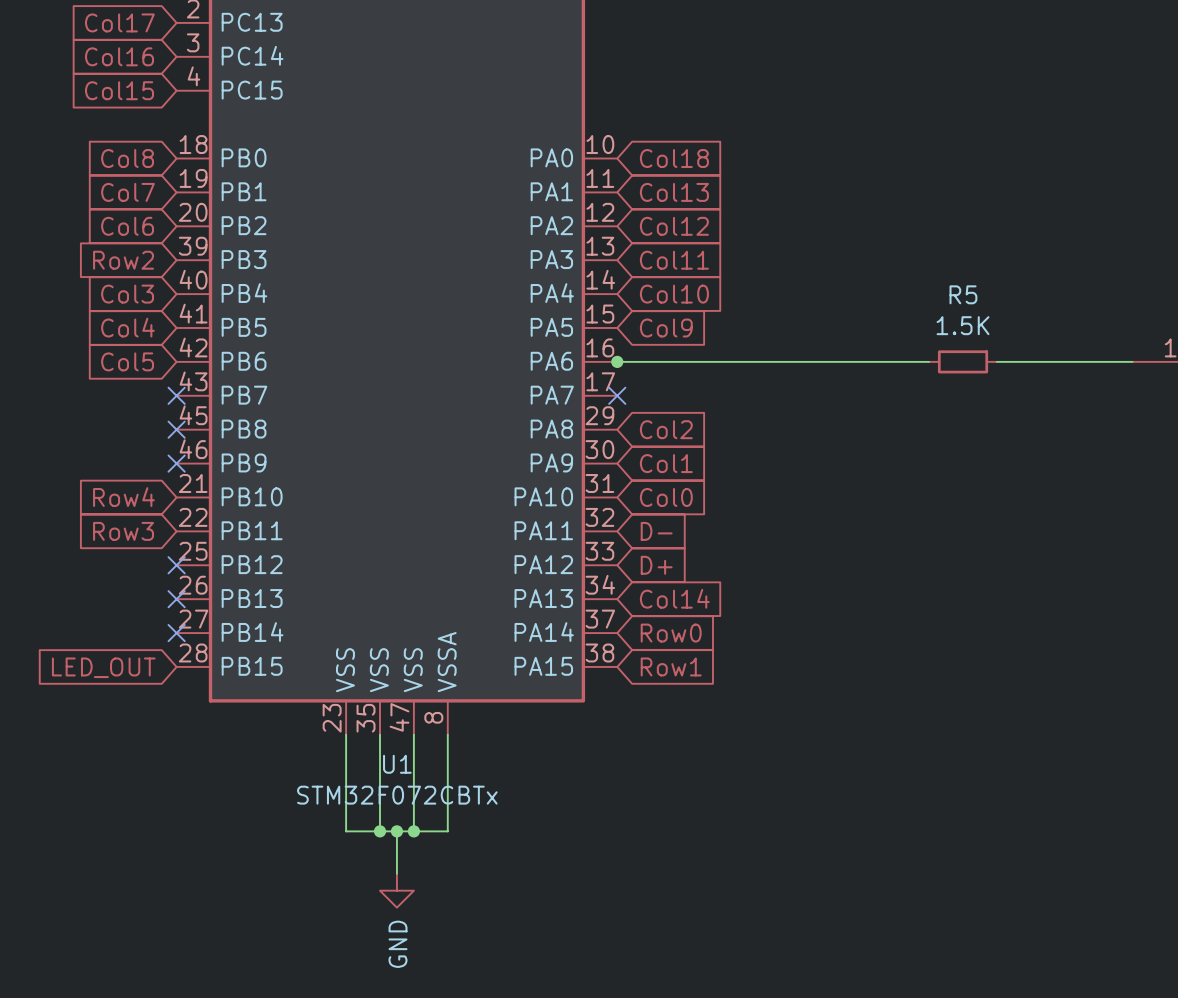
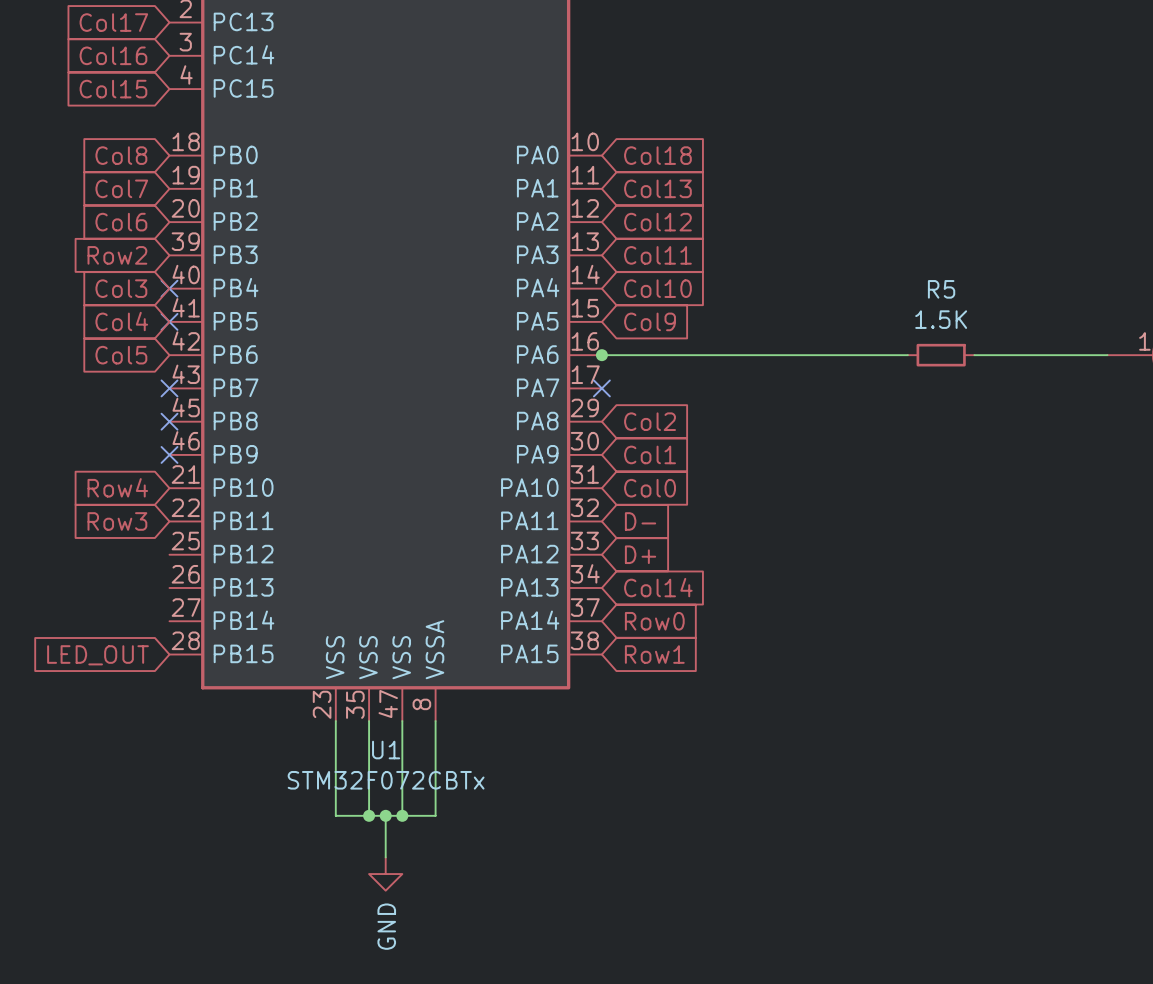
no-connect mark: none -> (169, 288)
no-connect mark: none -> (169, 321)
no-connect mark: (176, 565) -> none
no-connect mark: (176, 599) -> none
no-connect mark: (176, 633) -> none

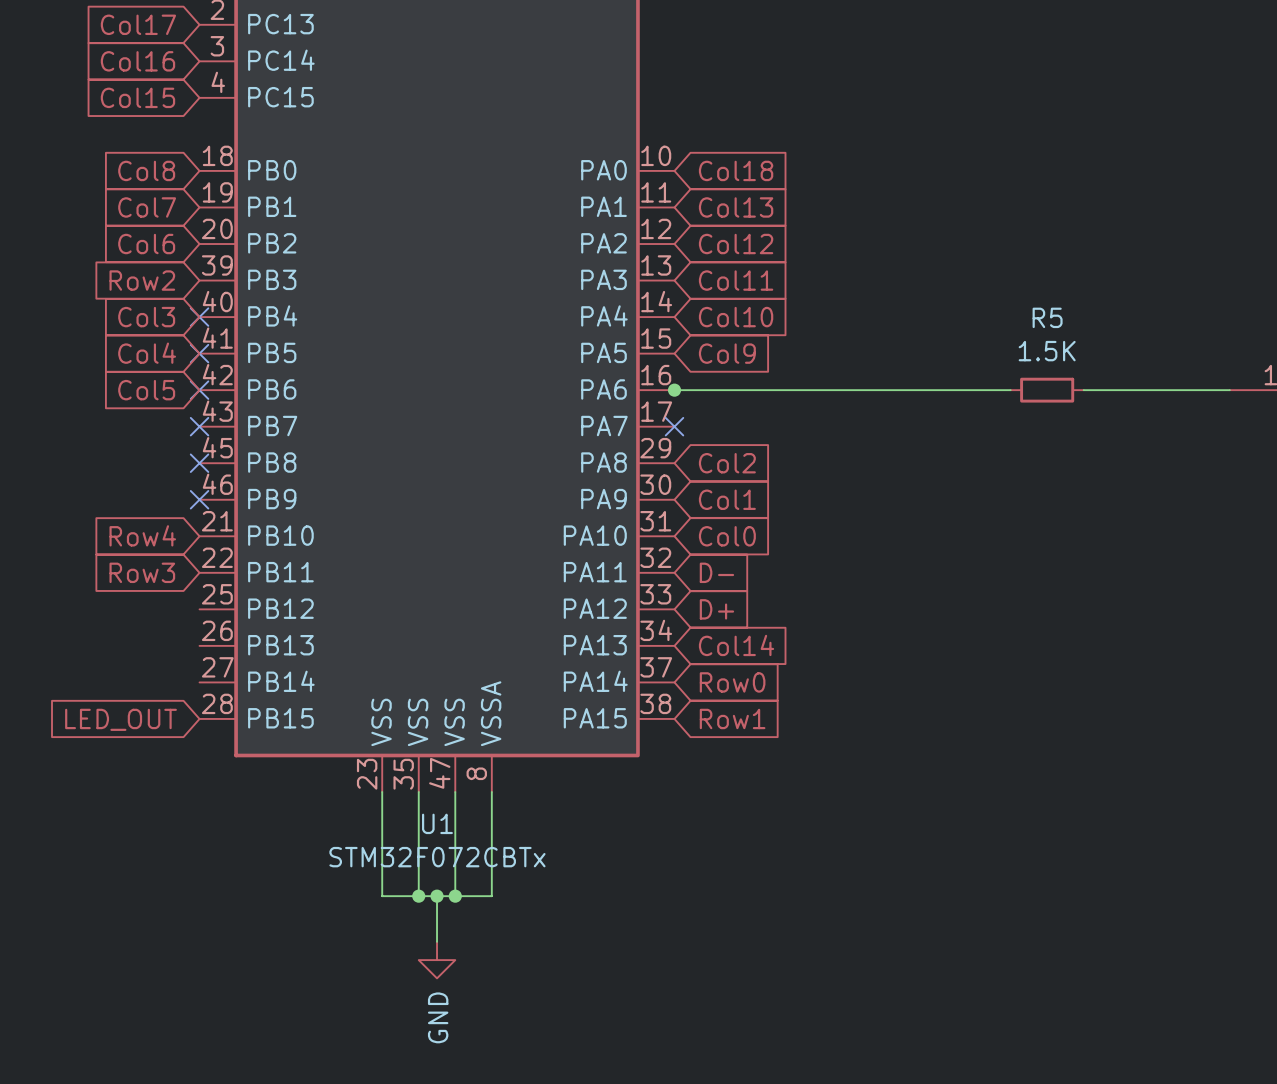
no-connect mark: none -> (199, 390)

